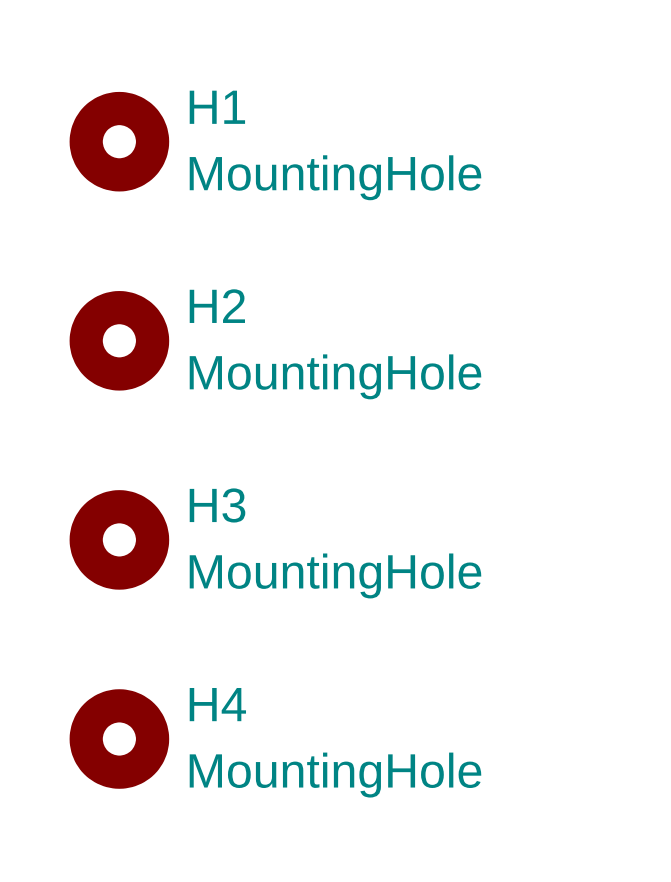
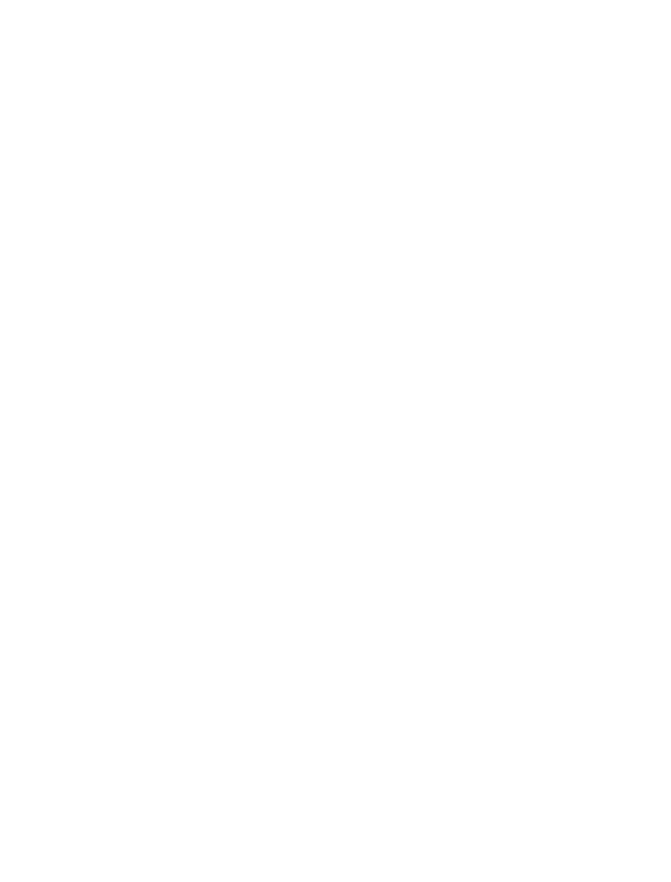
H1: MountingHole (119, 141) -> none
H2: MountingHole (119, 340) -> none
H3: MountingHole (119, 539) -> none
H4: MountingHole (119, 739) -> none

